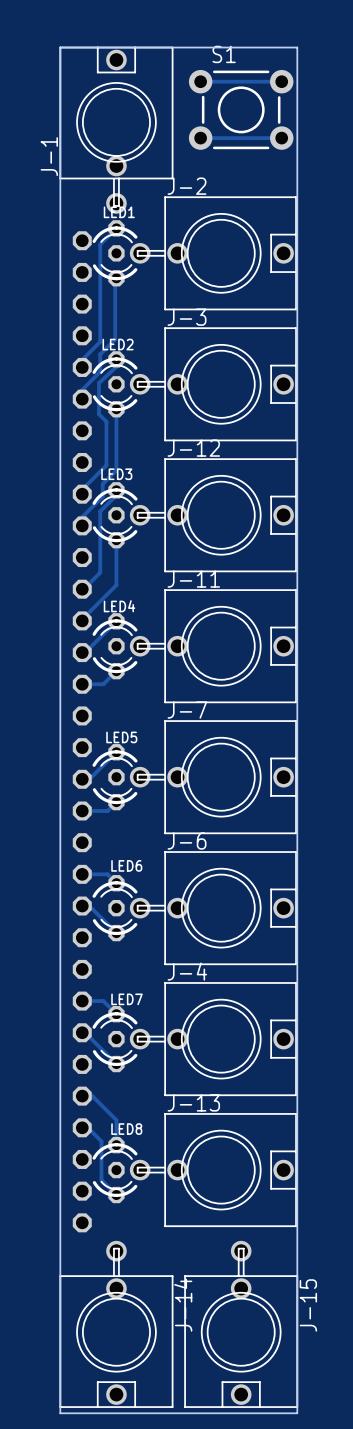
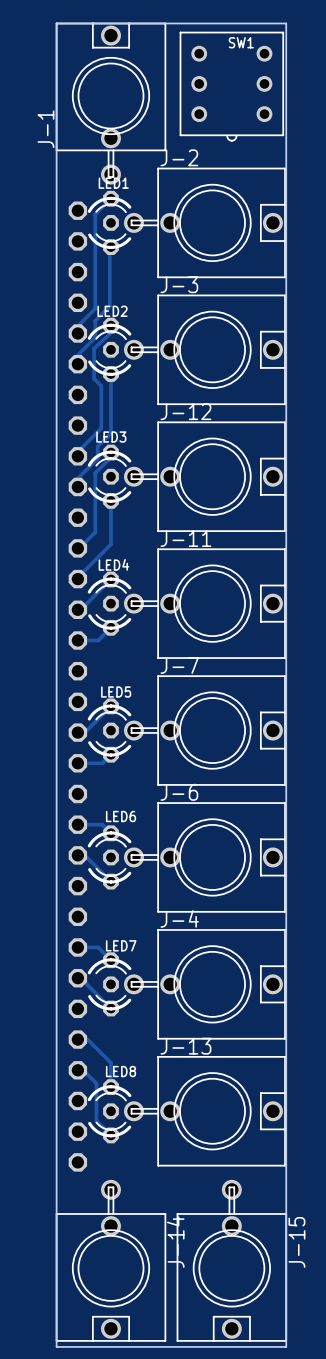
track: (200, 81) (281, 81) -> none
S1: (241, 109) -> none
SW1: none -> (231, 86)
track: (200, 138) (281, 138) -> none

